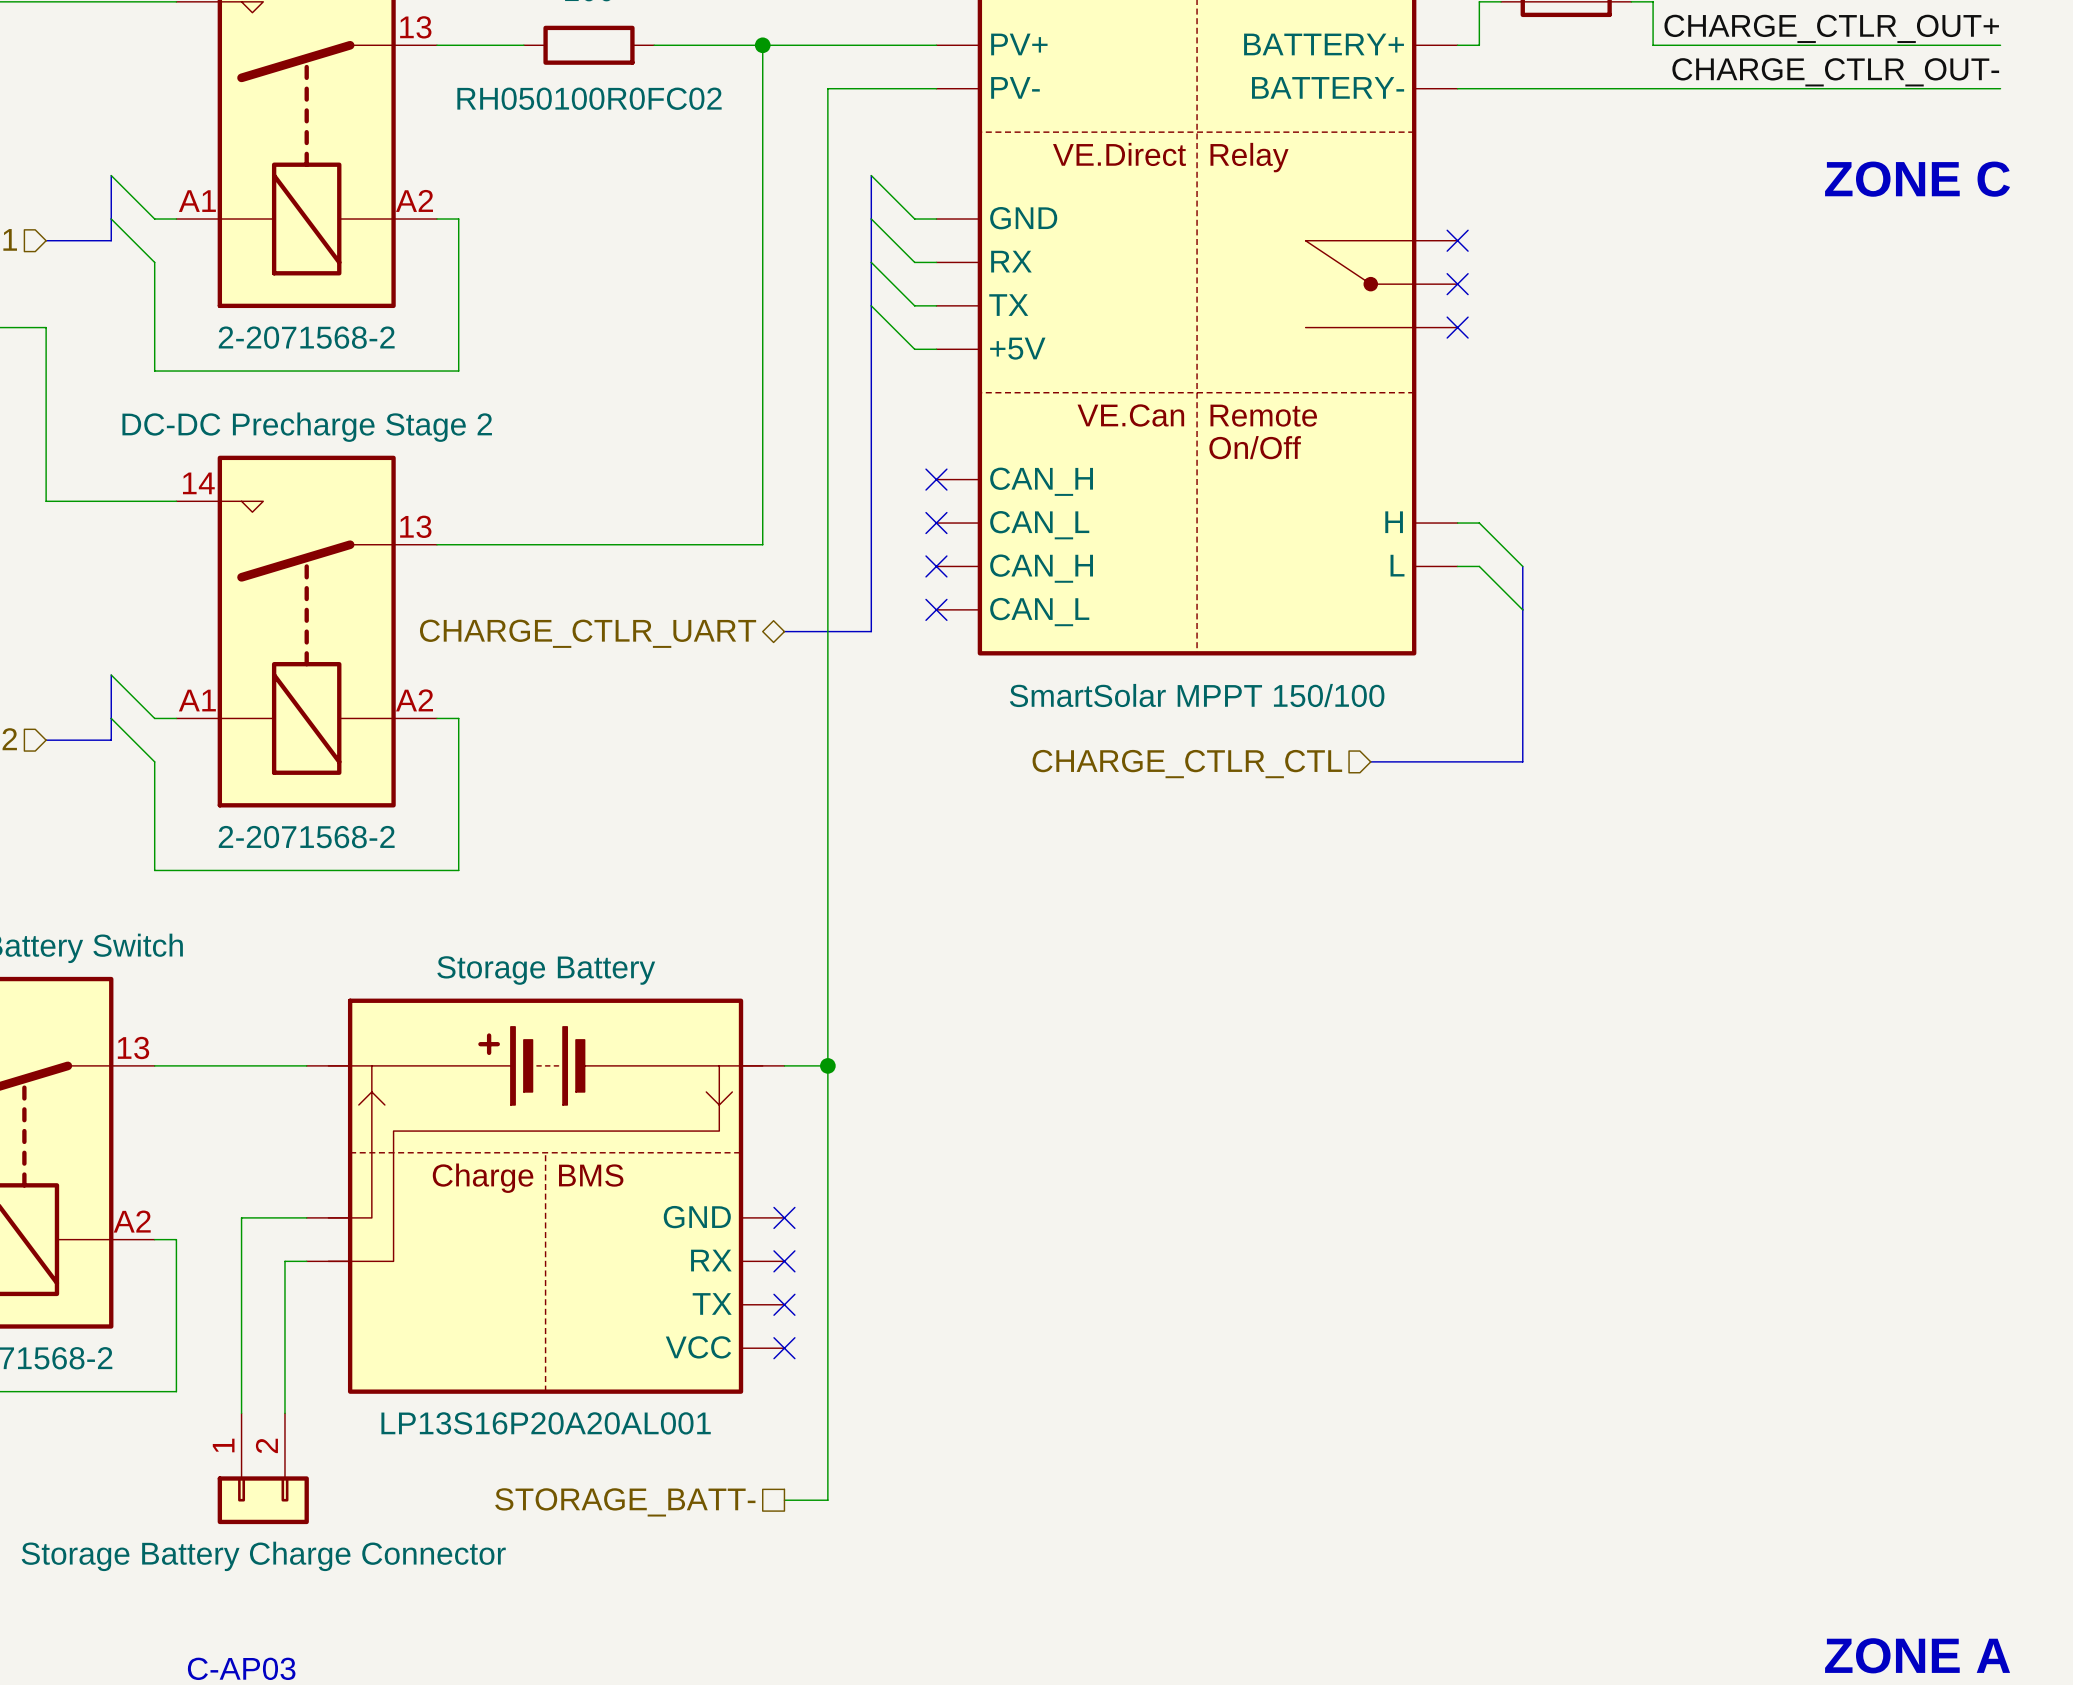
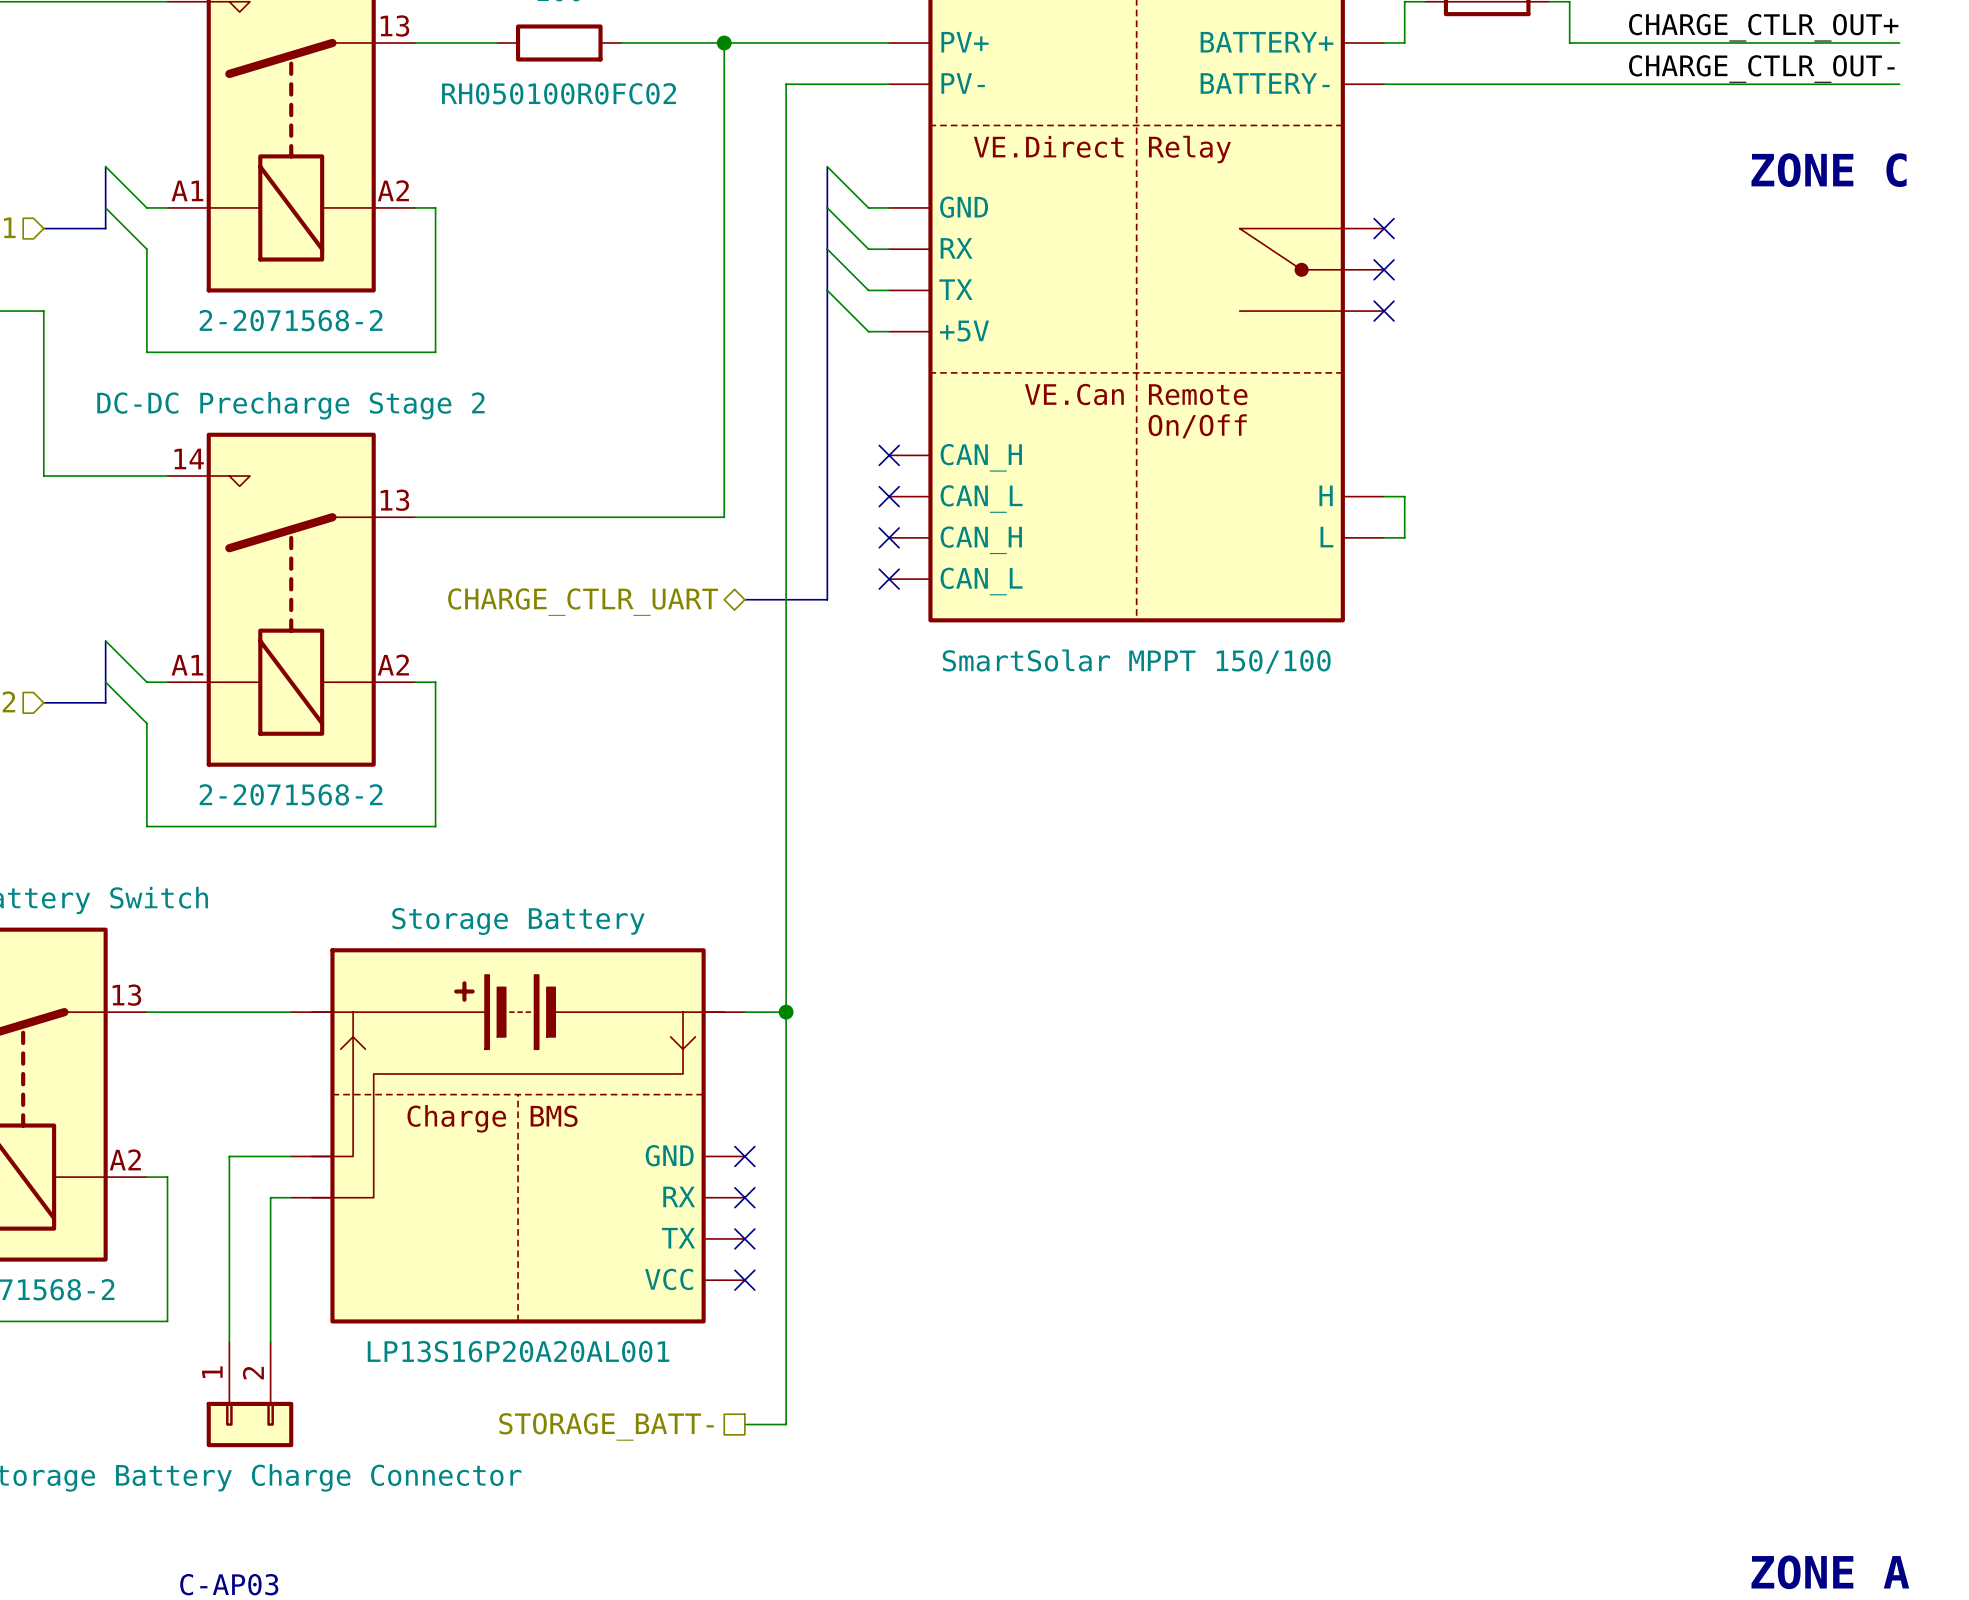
wire: (1479, 523) (1522, 566) -> (1404, 496) (1404, 537)
wire: (1479, 566) (1522, 609) -> none
bus: (1522, 566) (1522, 761) (1370, 761) -> none
hierarchical label: CHARGE_CTLR_CTL (1187, 764) -> none

